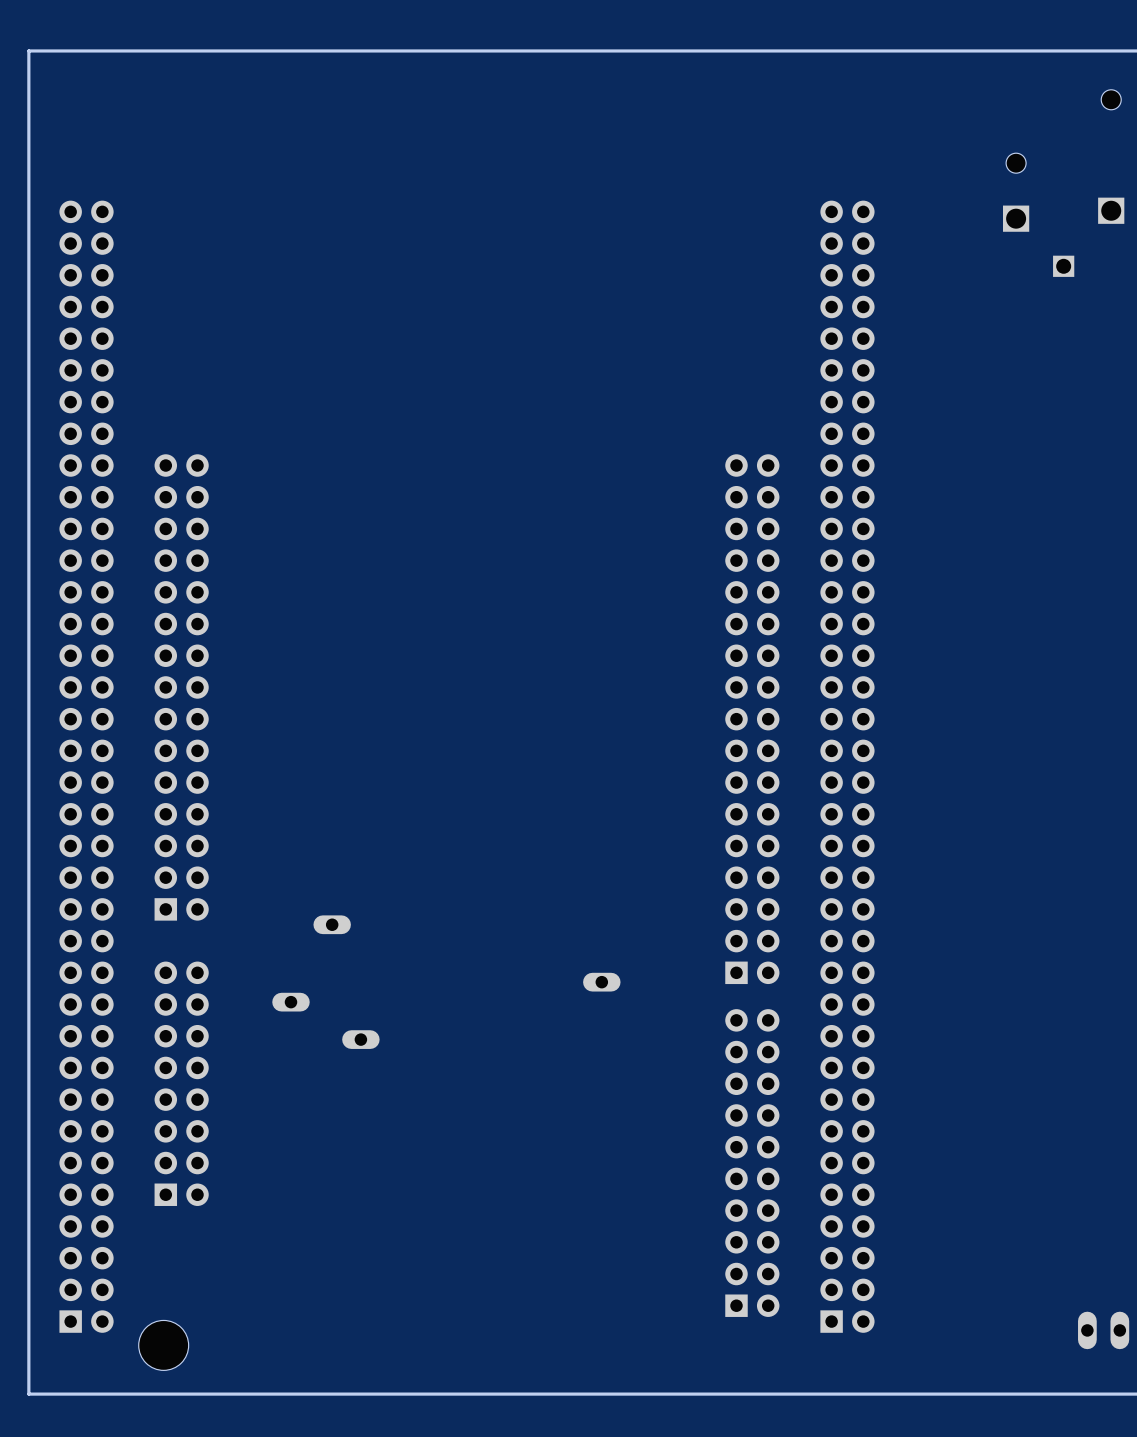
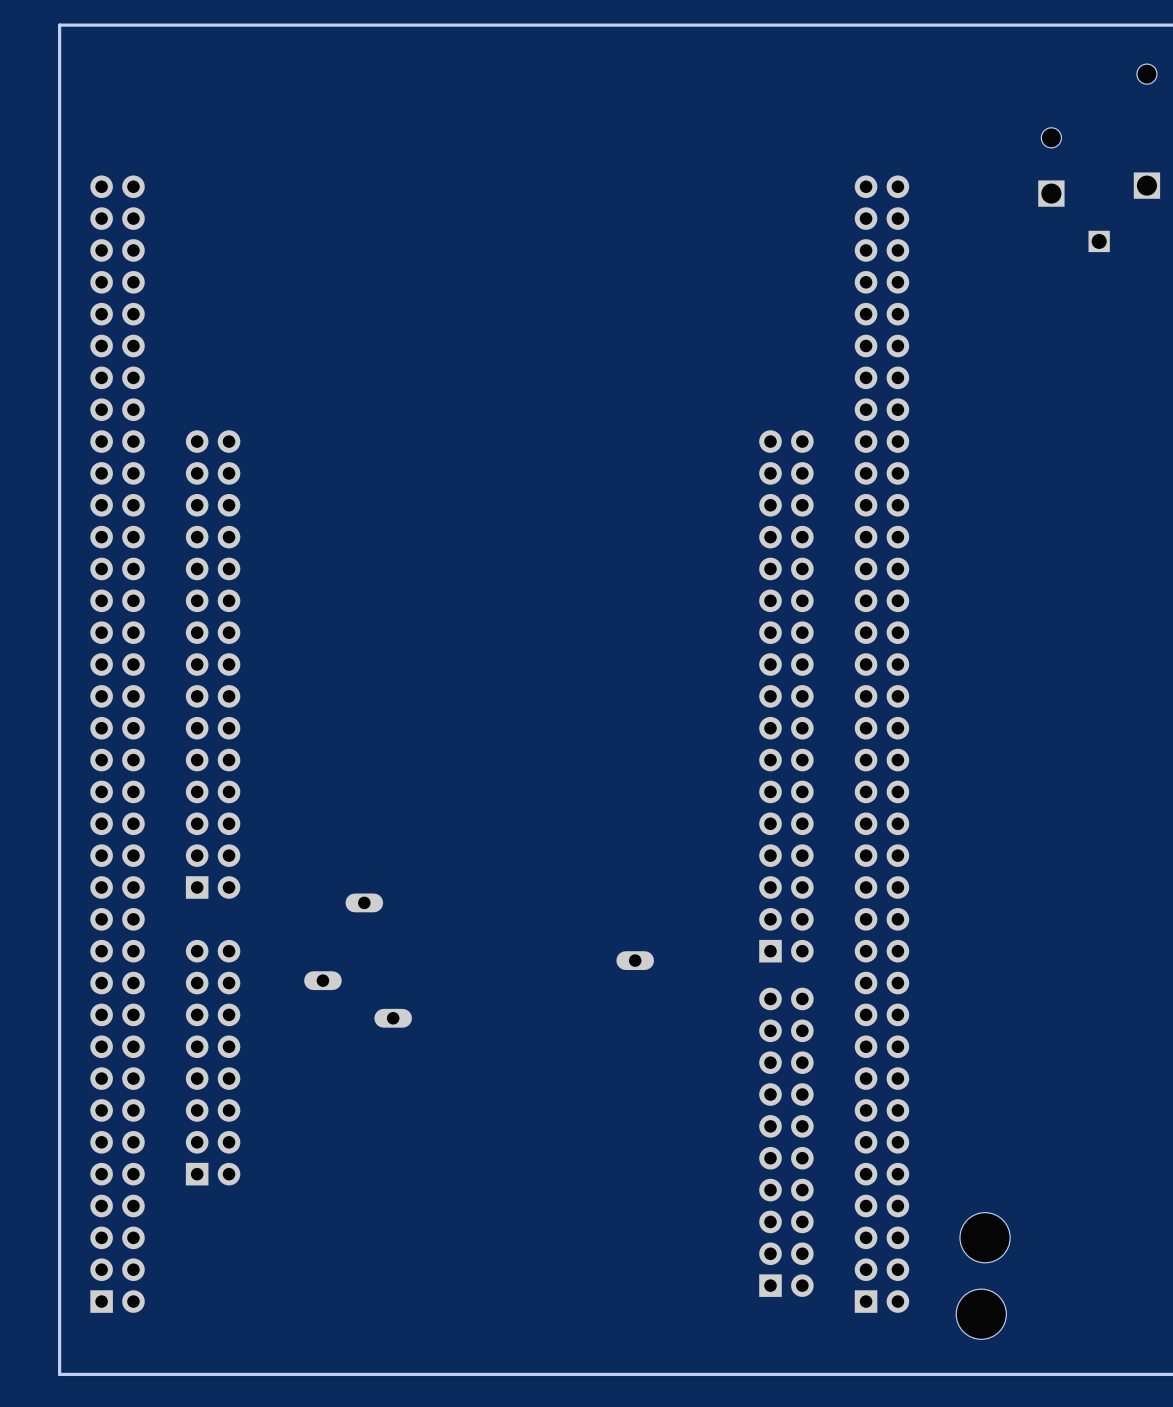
hole: none -> (985, 1237)
part: (1087, 1330) -> none
part: (1119, 1330) -> none
hole: none -> (981, 1314)
hole: (163, 1345) -> none

